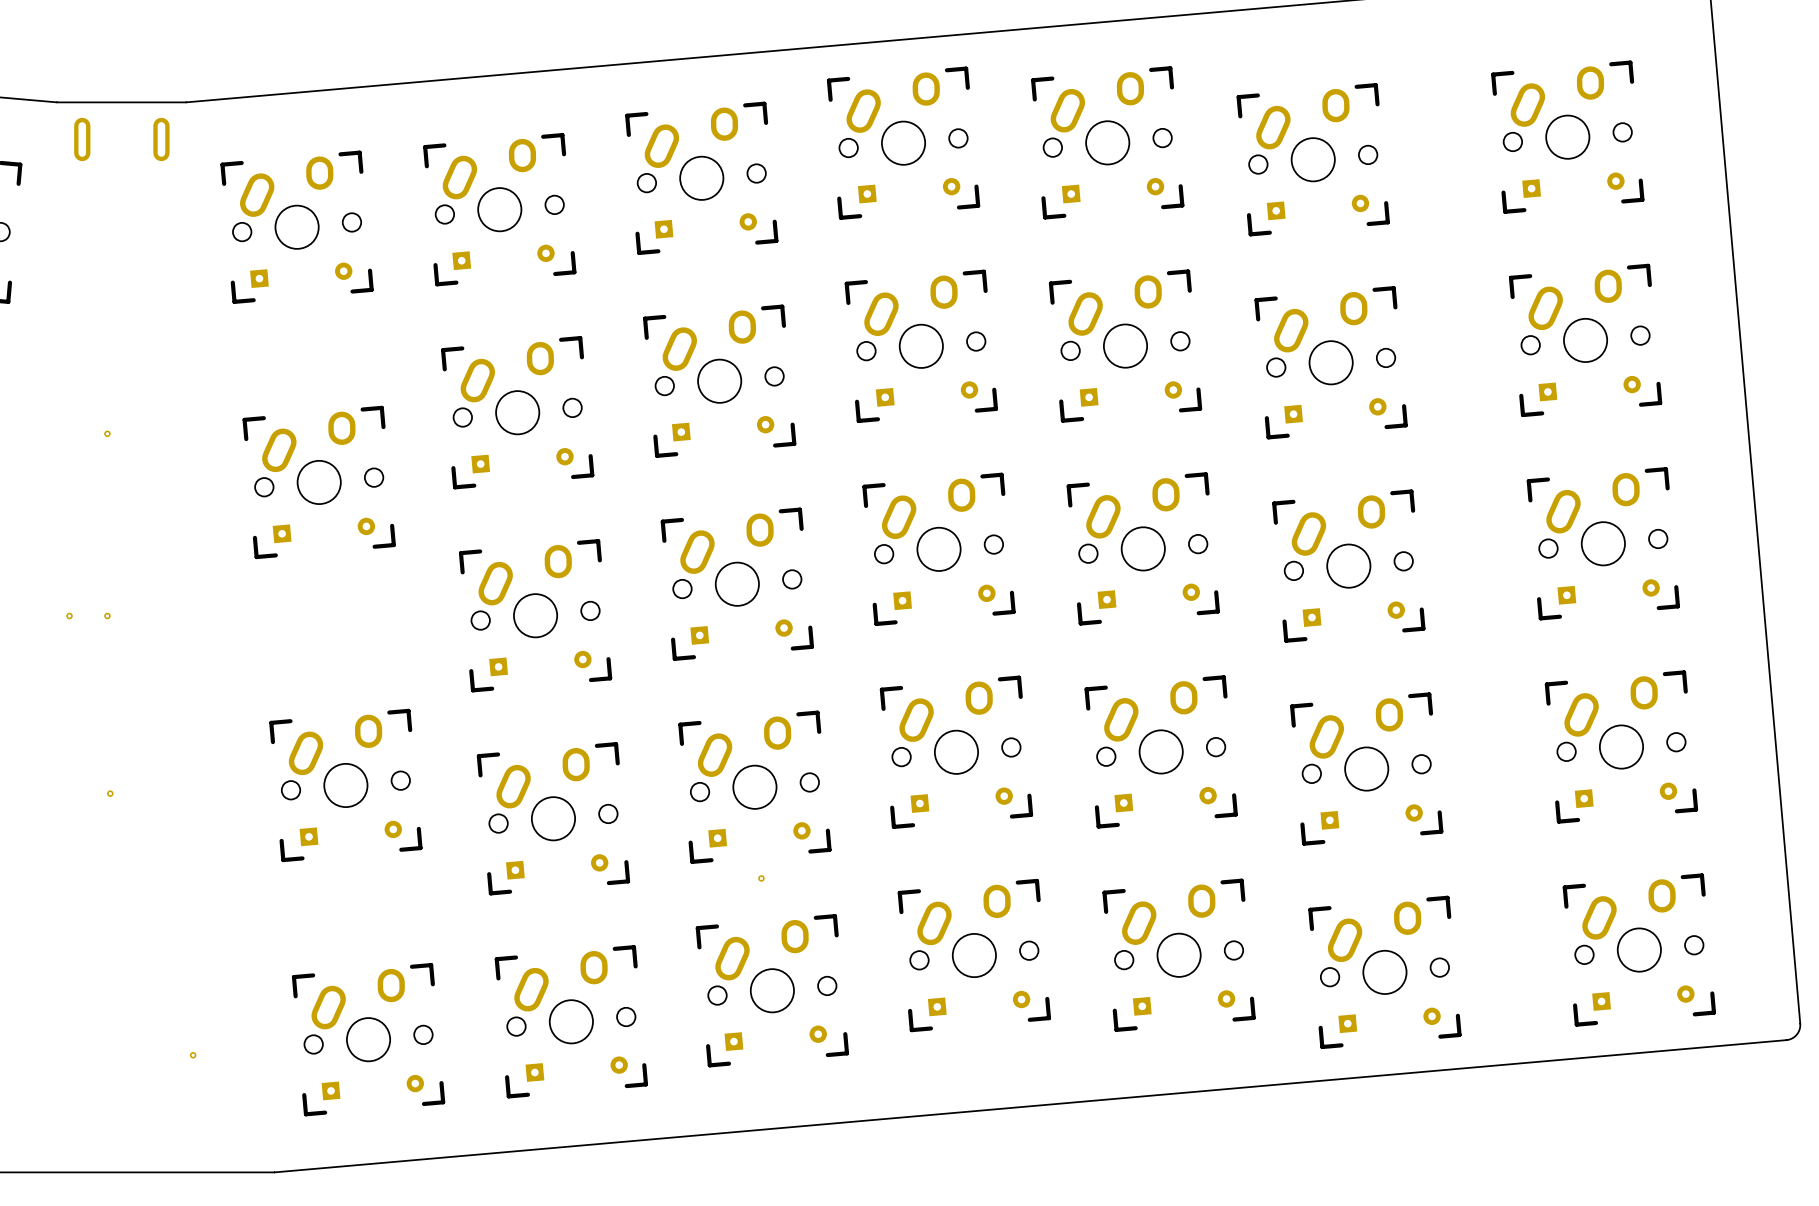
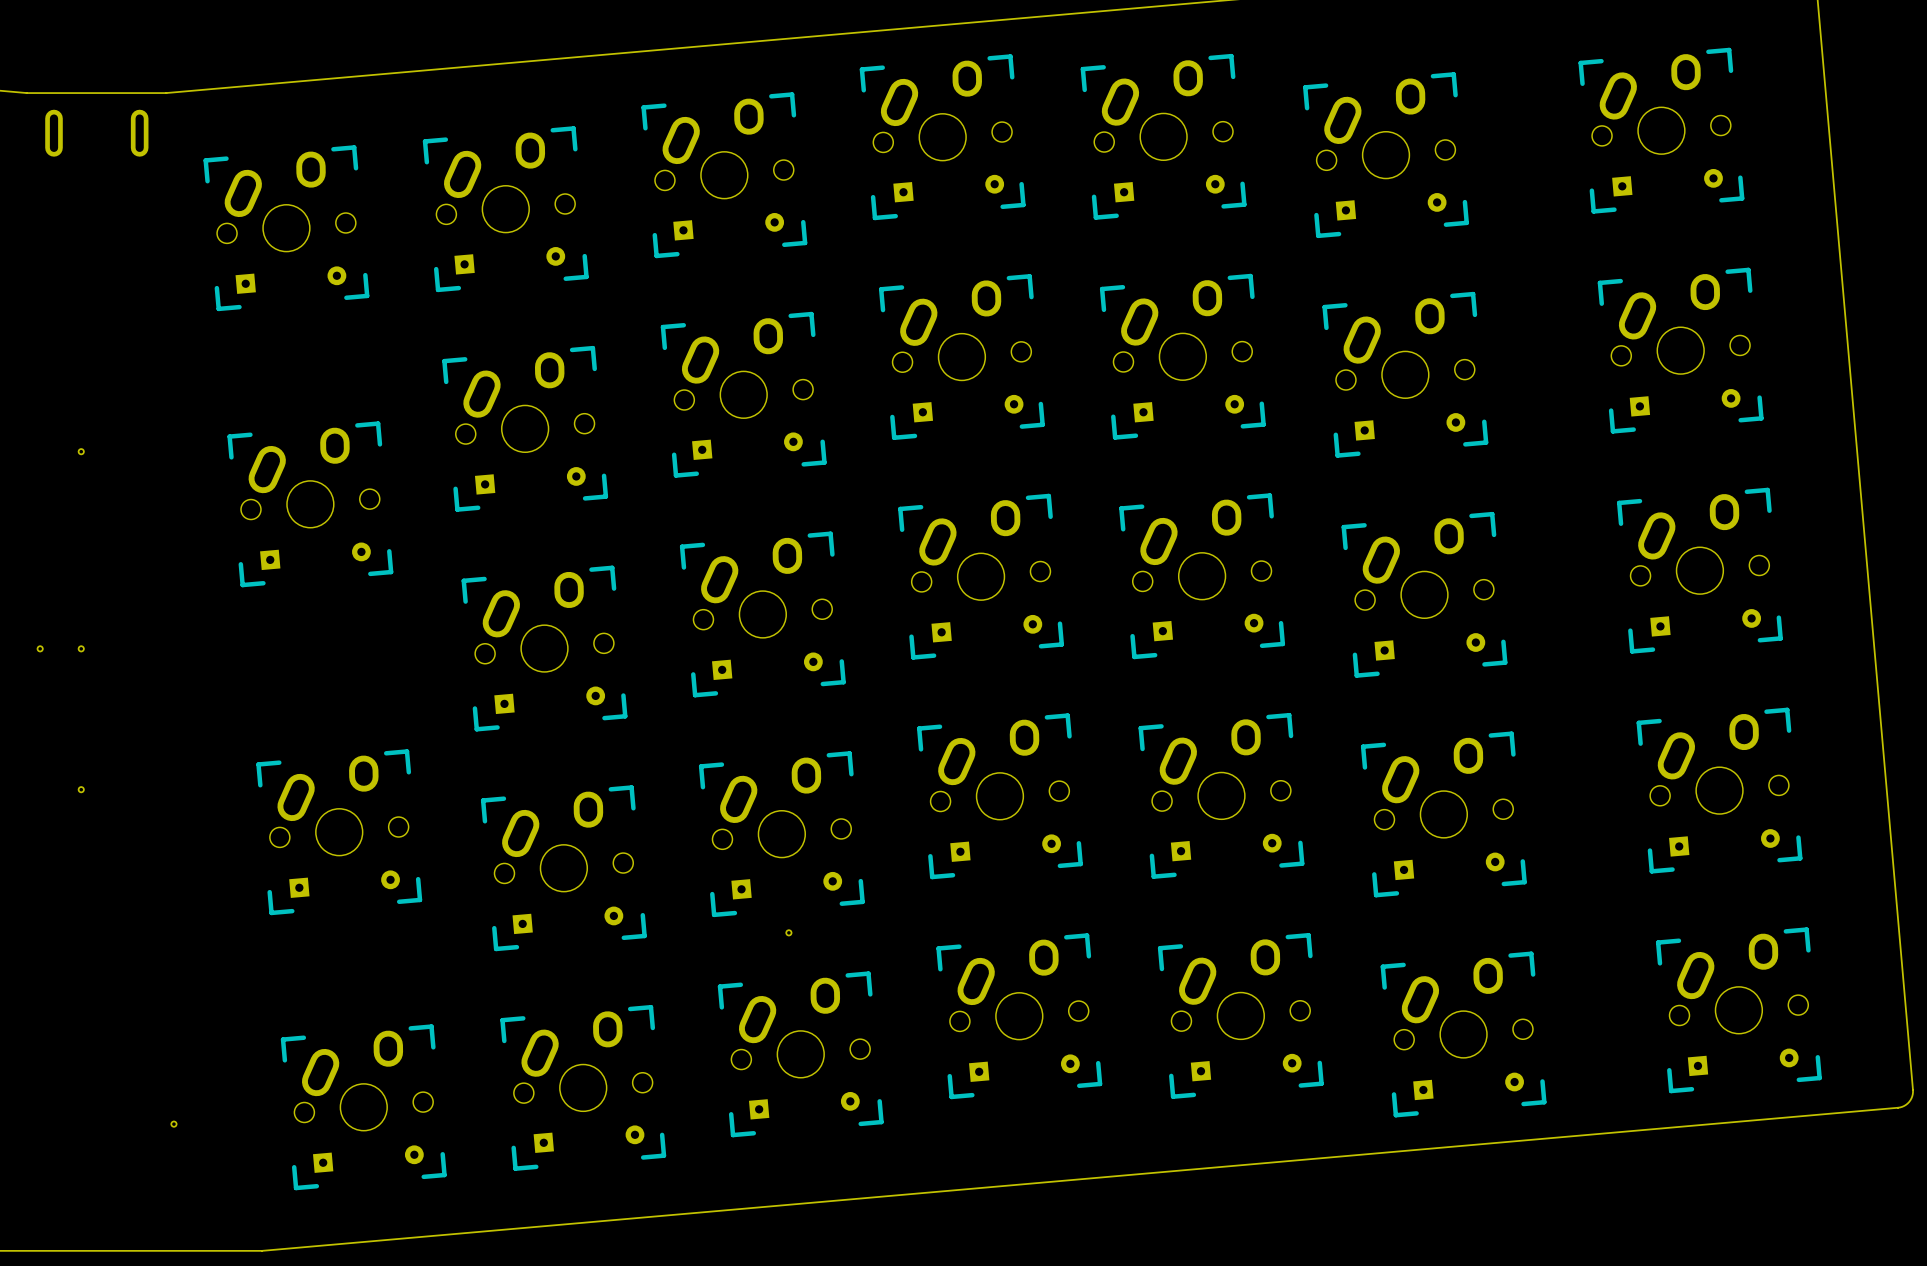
part position: (110, 793) -> (81, 789)

